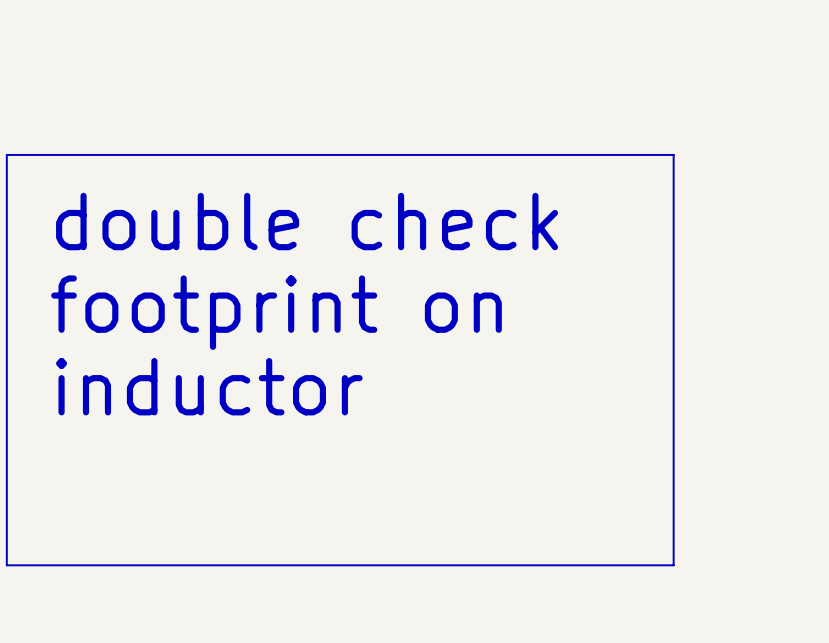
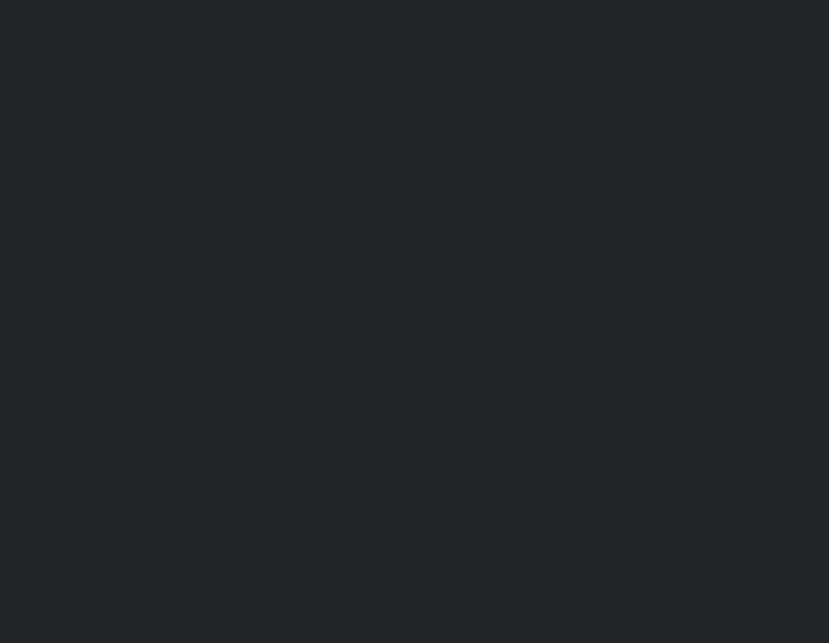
line: (6, 154) (673, 154) (673, 565) (6, 565) (6, 154) -> none
text: double check (307, 221) -> none
text: footprint on (276, 312) -> none
text: inductor (209, 386) -> none

